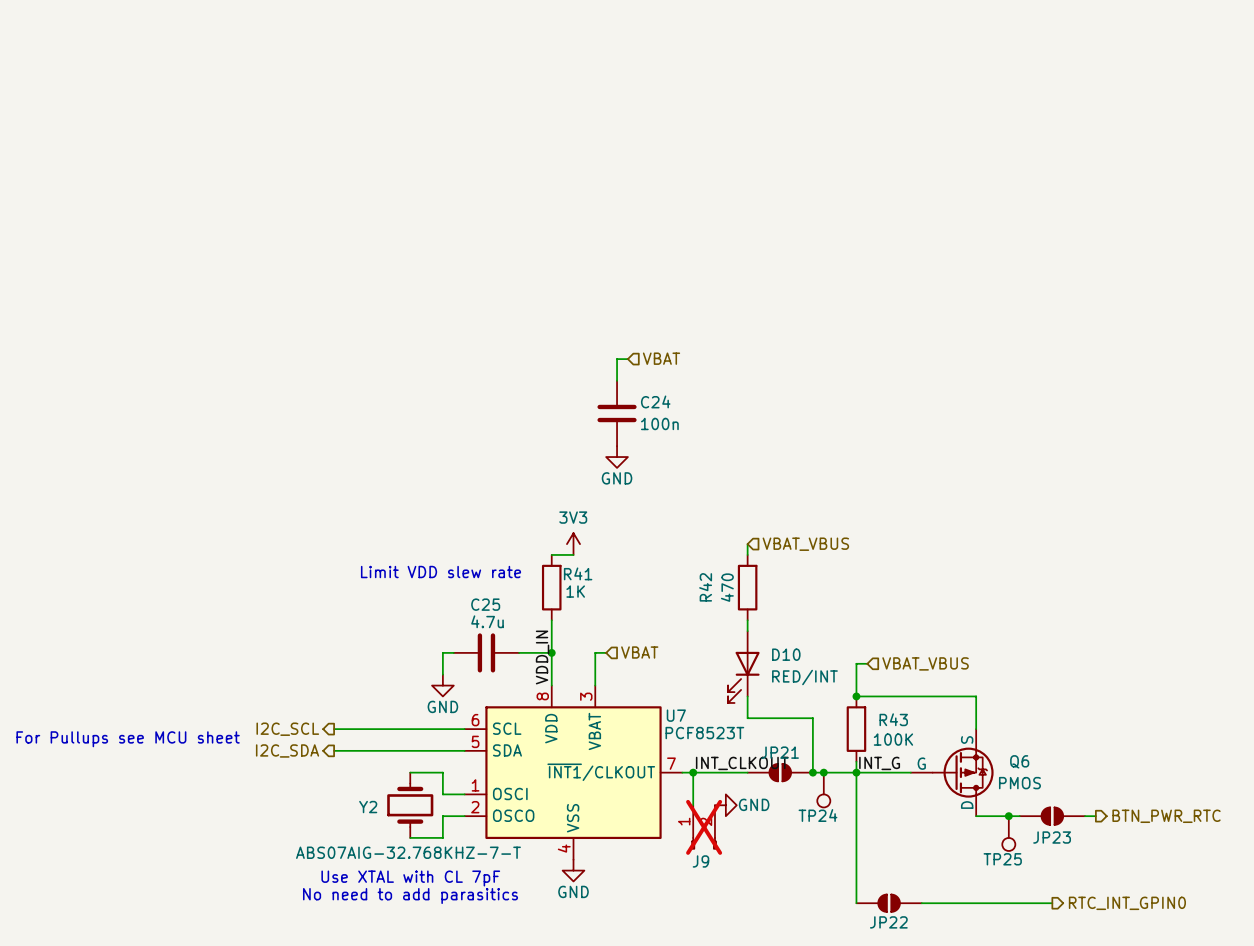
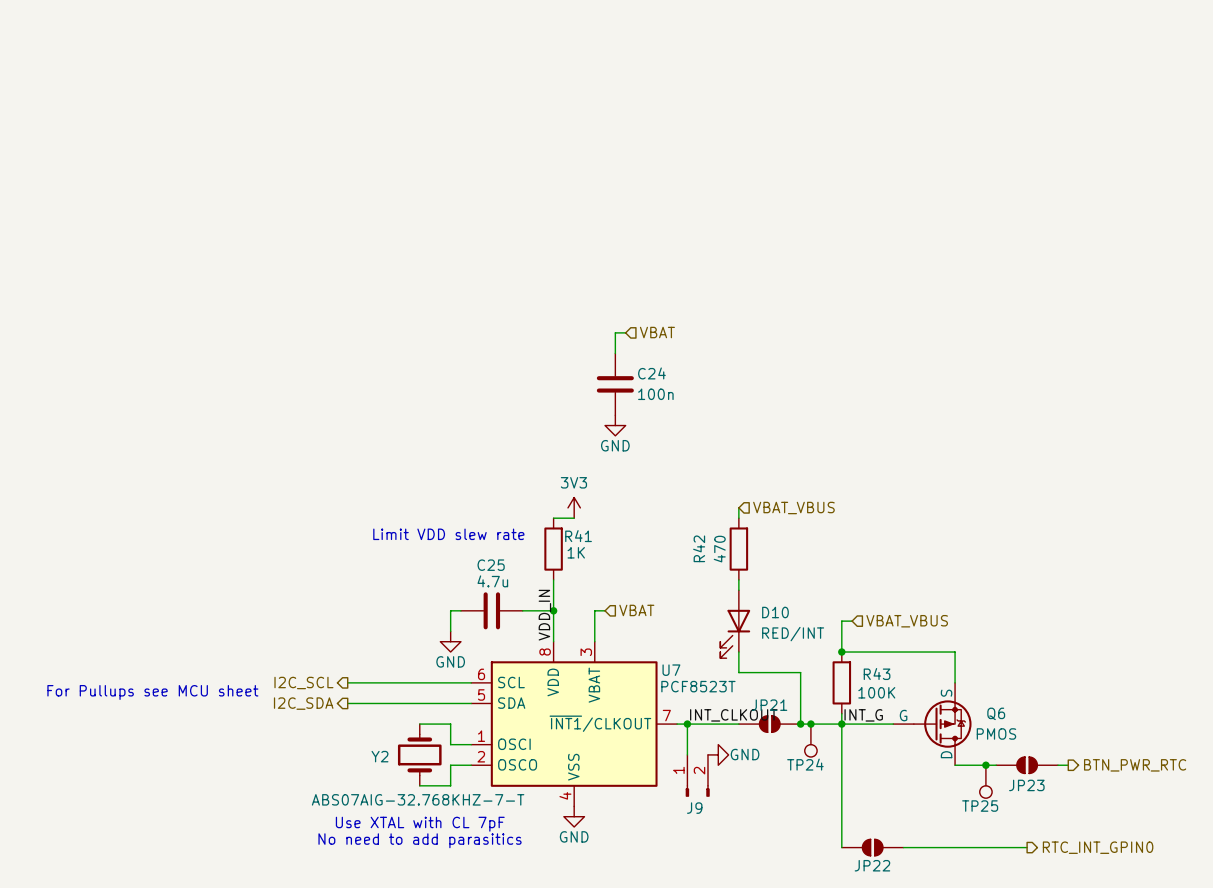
J9 do-not-place cross: (704, 827) -> none

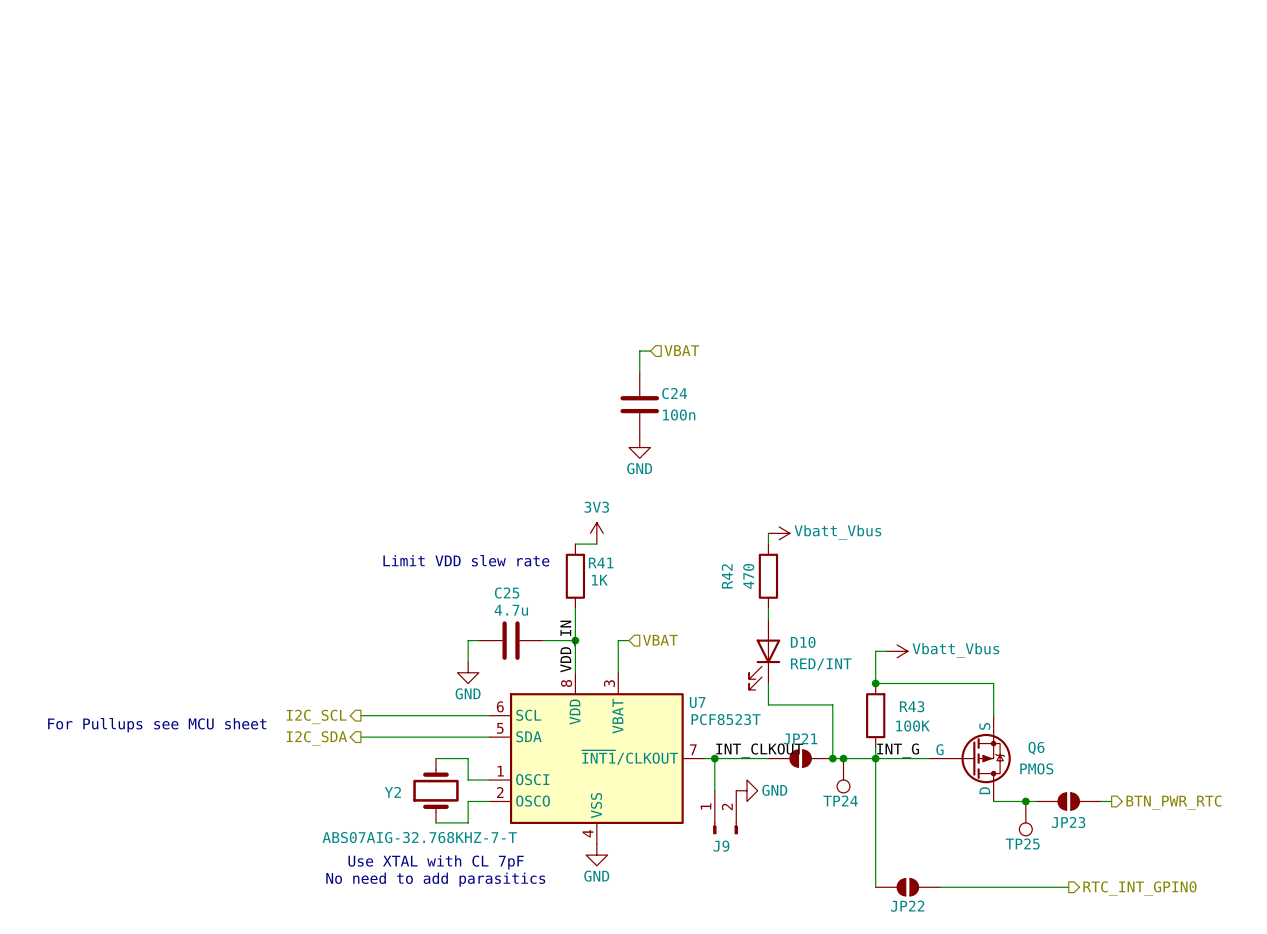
power symbol: none -> Vbatt_Vbus (779, 533)
hierarchical label: VBAT_VBUS (793, 508) -> none
power symbol: none -> Vbatt_Vbus (897, 651)
hierarchical label: VBAT_VBUS (907, 621) -> none

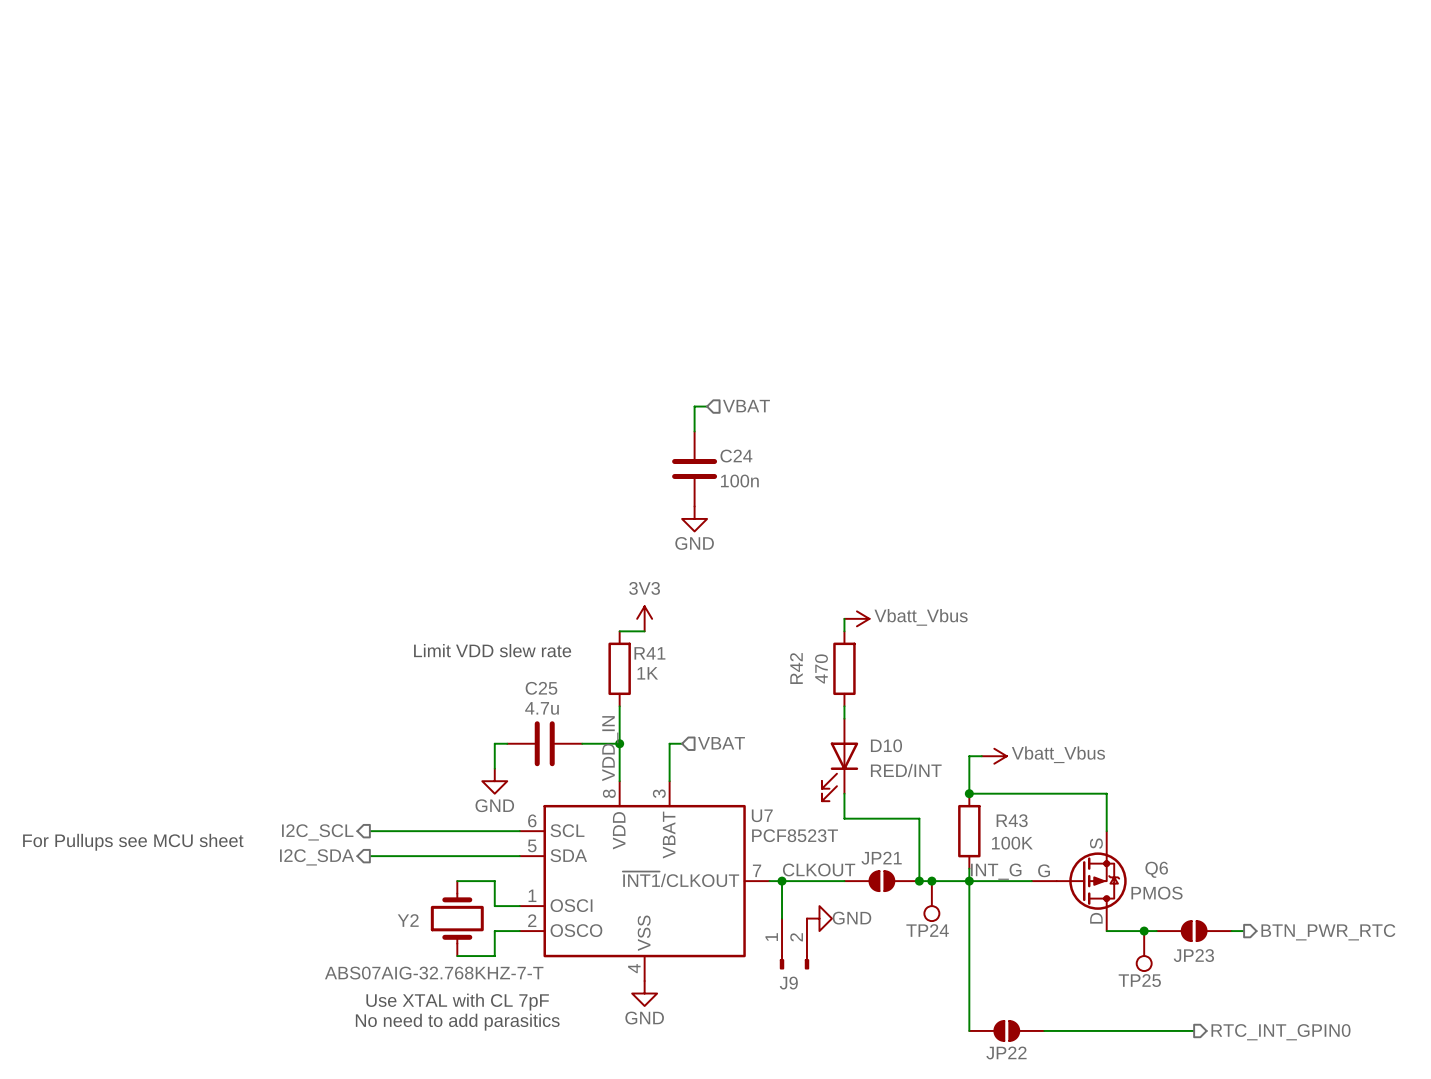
label: INT_CLKOUT (759, 750) -> CLKOUT (819, 869)

